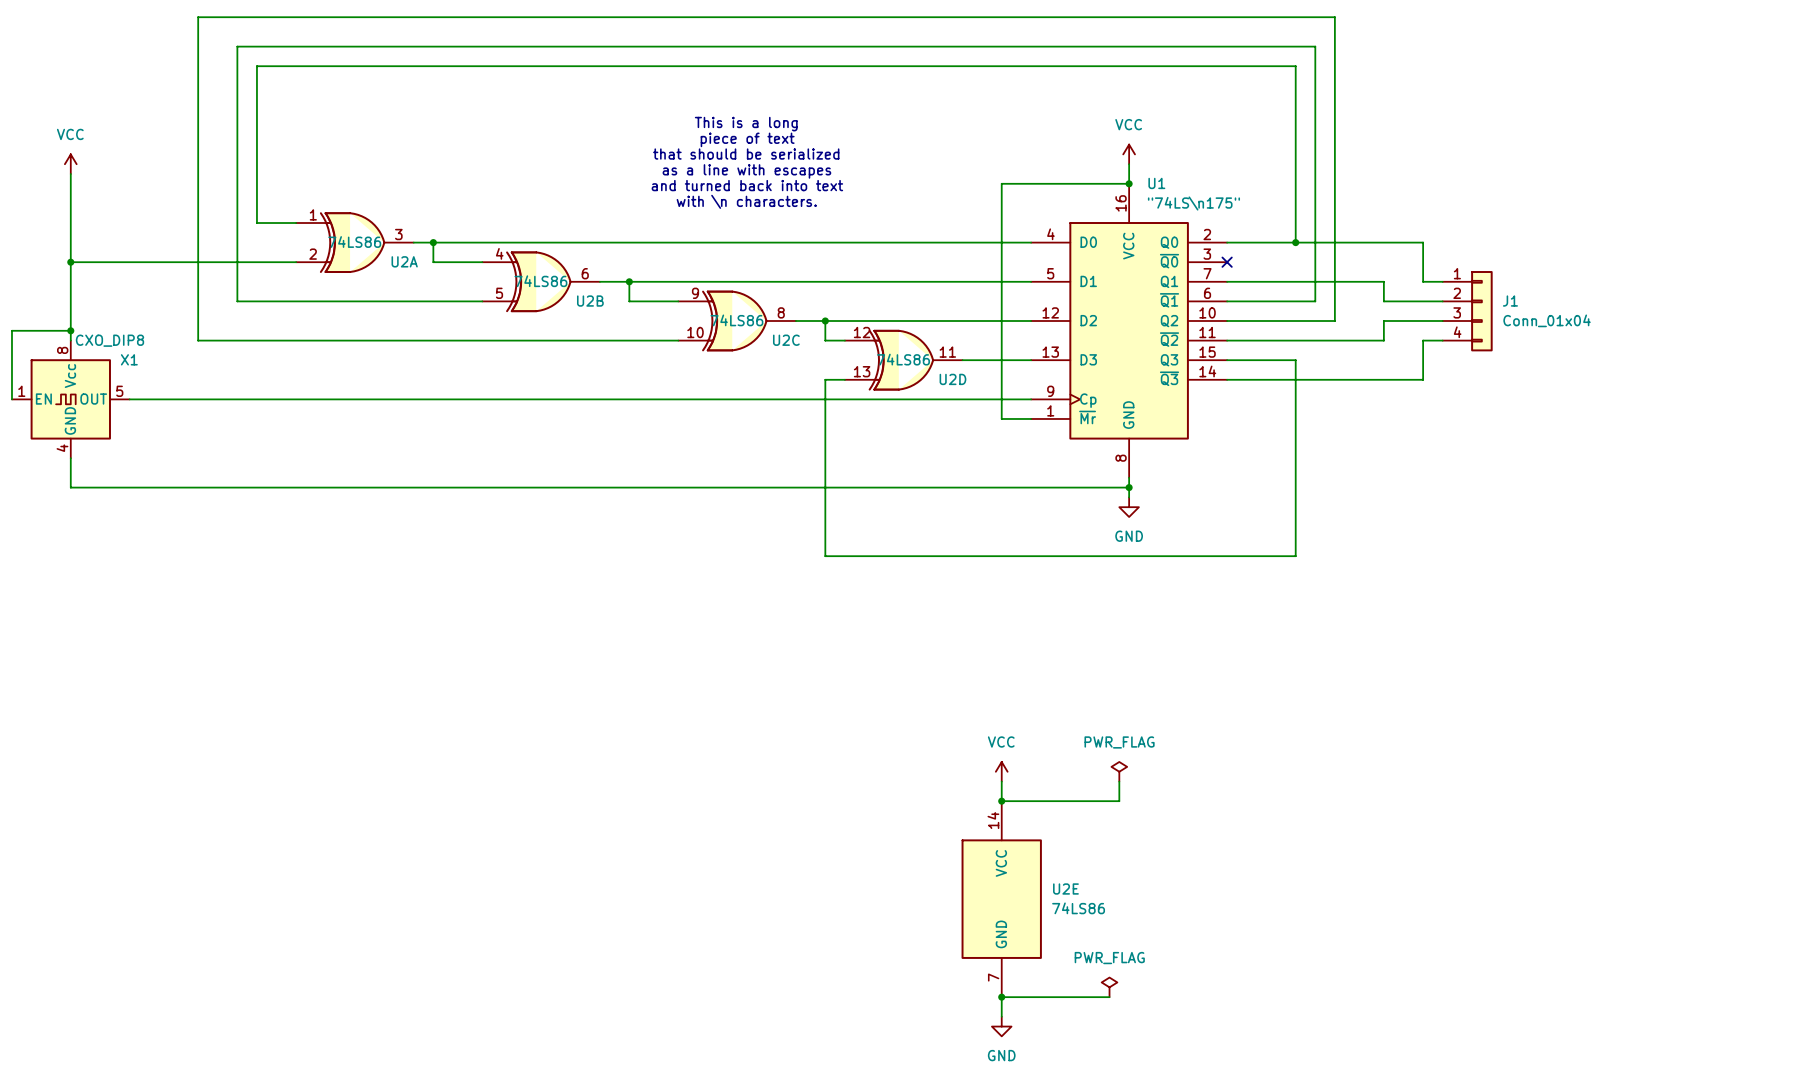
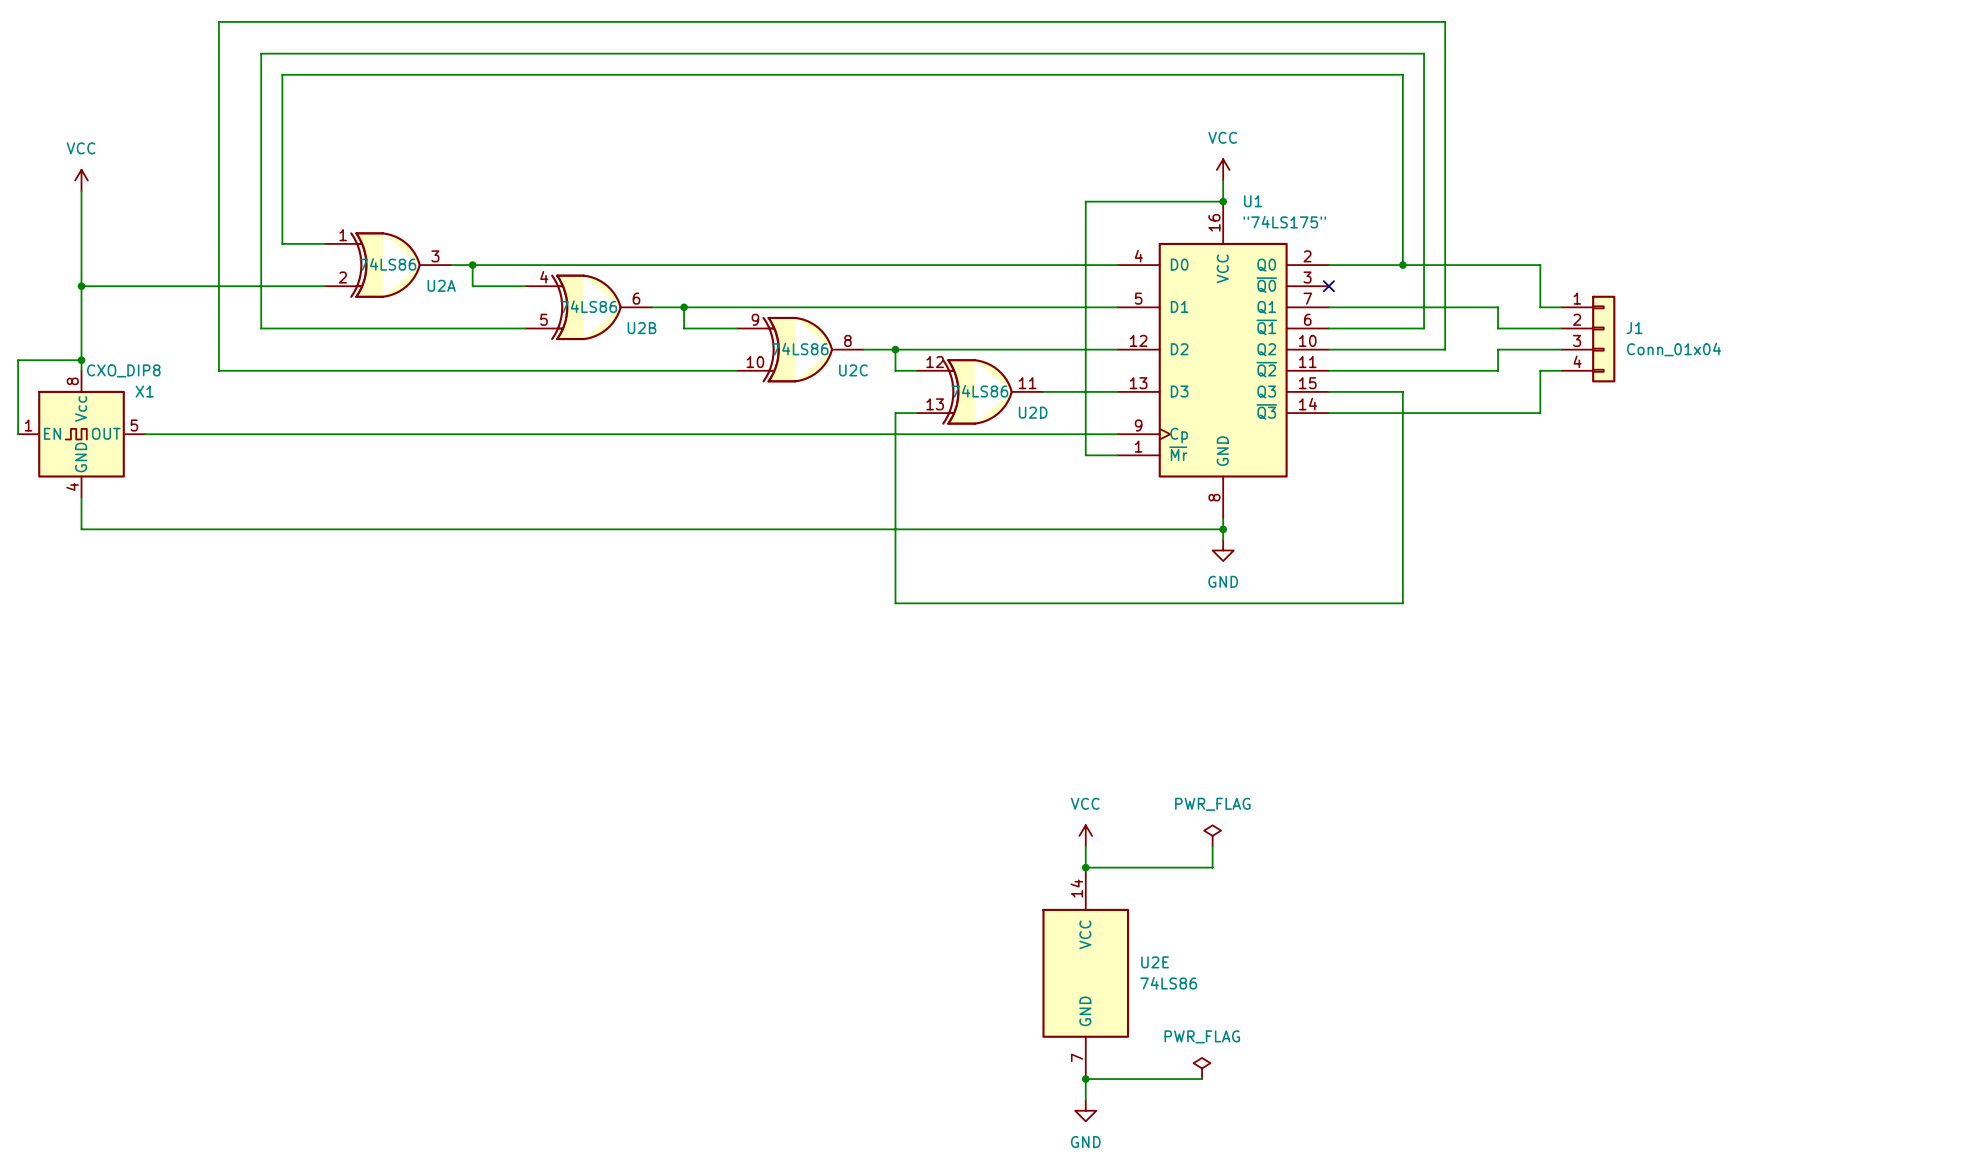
text: This is a long (746, 124) -> none
text: piece of text (747, 139) -> none
text: that should be serialized (746, 154) -> none
text: as a line with escapes (746, 171) -> none
text: and turned back into text (747, 185) -> none
text: with \n characters. (746, 201) -> none
U1 value: "74LS\n175" (1193, 203) -> "74LS175" (1284, 222)

